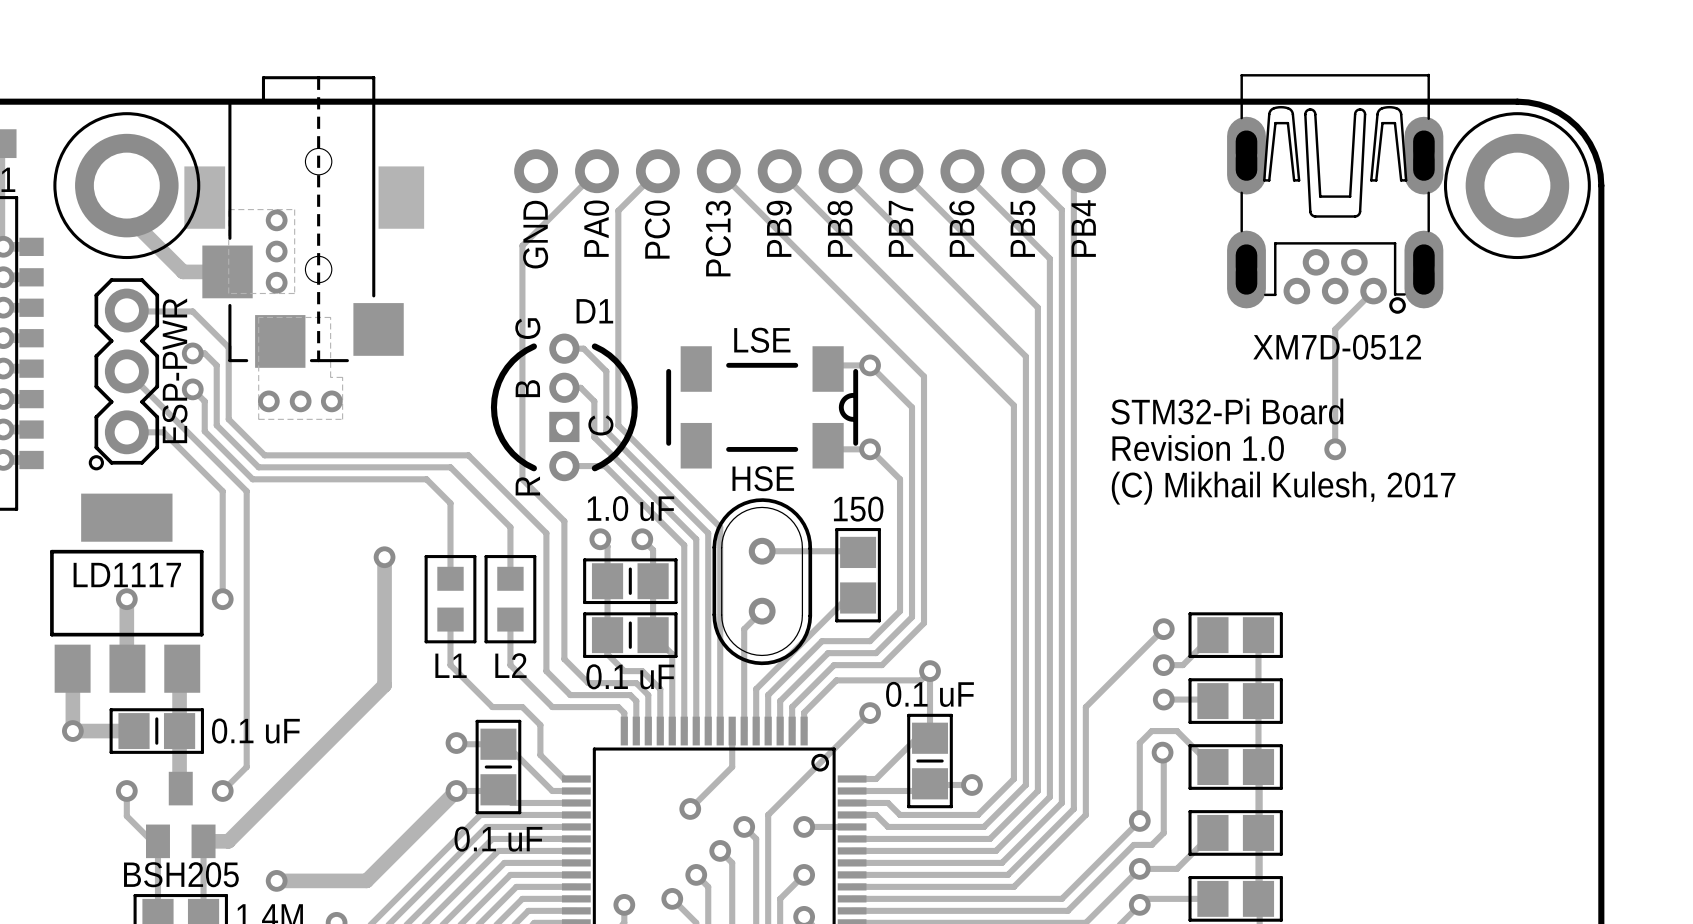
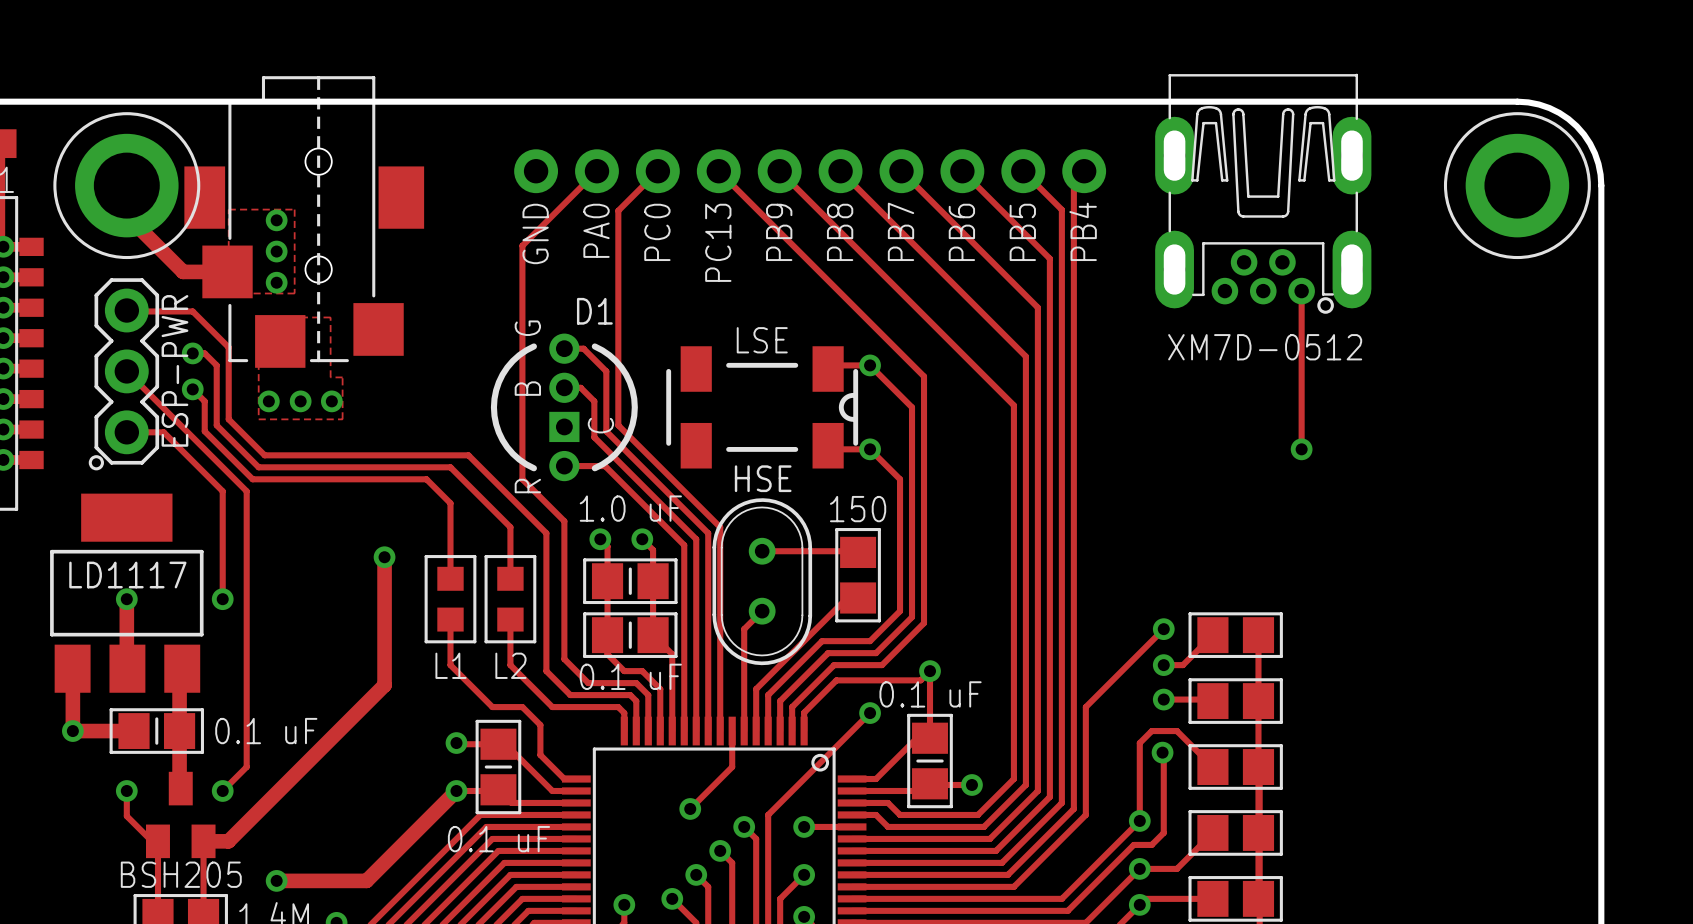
part position: (1335, 193) -> (1263, 193)
track: none -> (1301, 291) (1301, 449)
track: (1373, 291) (1335, 329) (1335, 449) -> none
text: STM32-Pi Board (1227, 411) -> none
text: Revision 1.0 (1198, 448) -> none
via position: (1335, 449) -> (1301, 449)
text: (C) Mikhail Kulesh, 2017 (1283, 488) -> none

